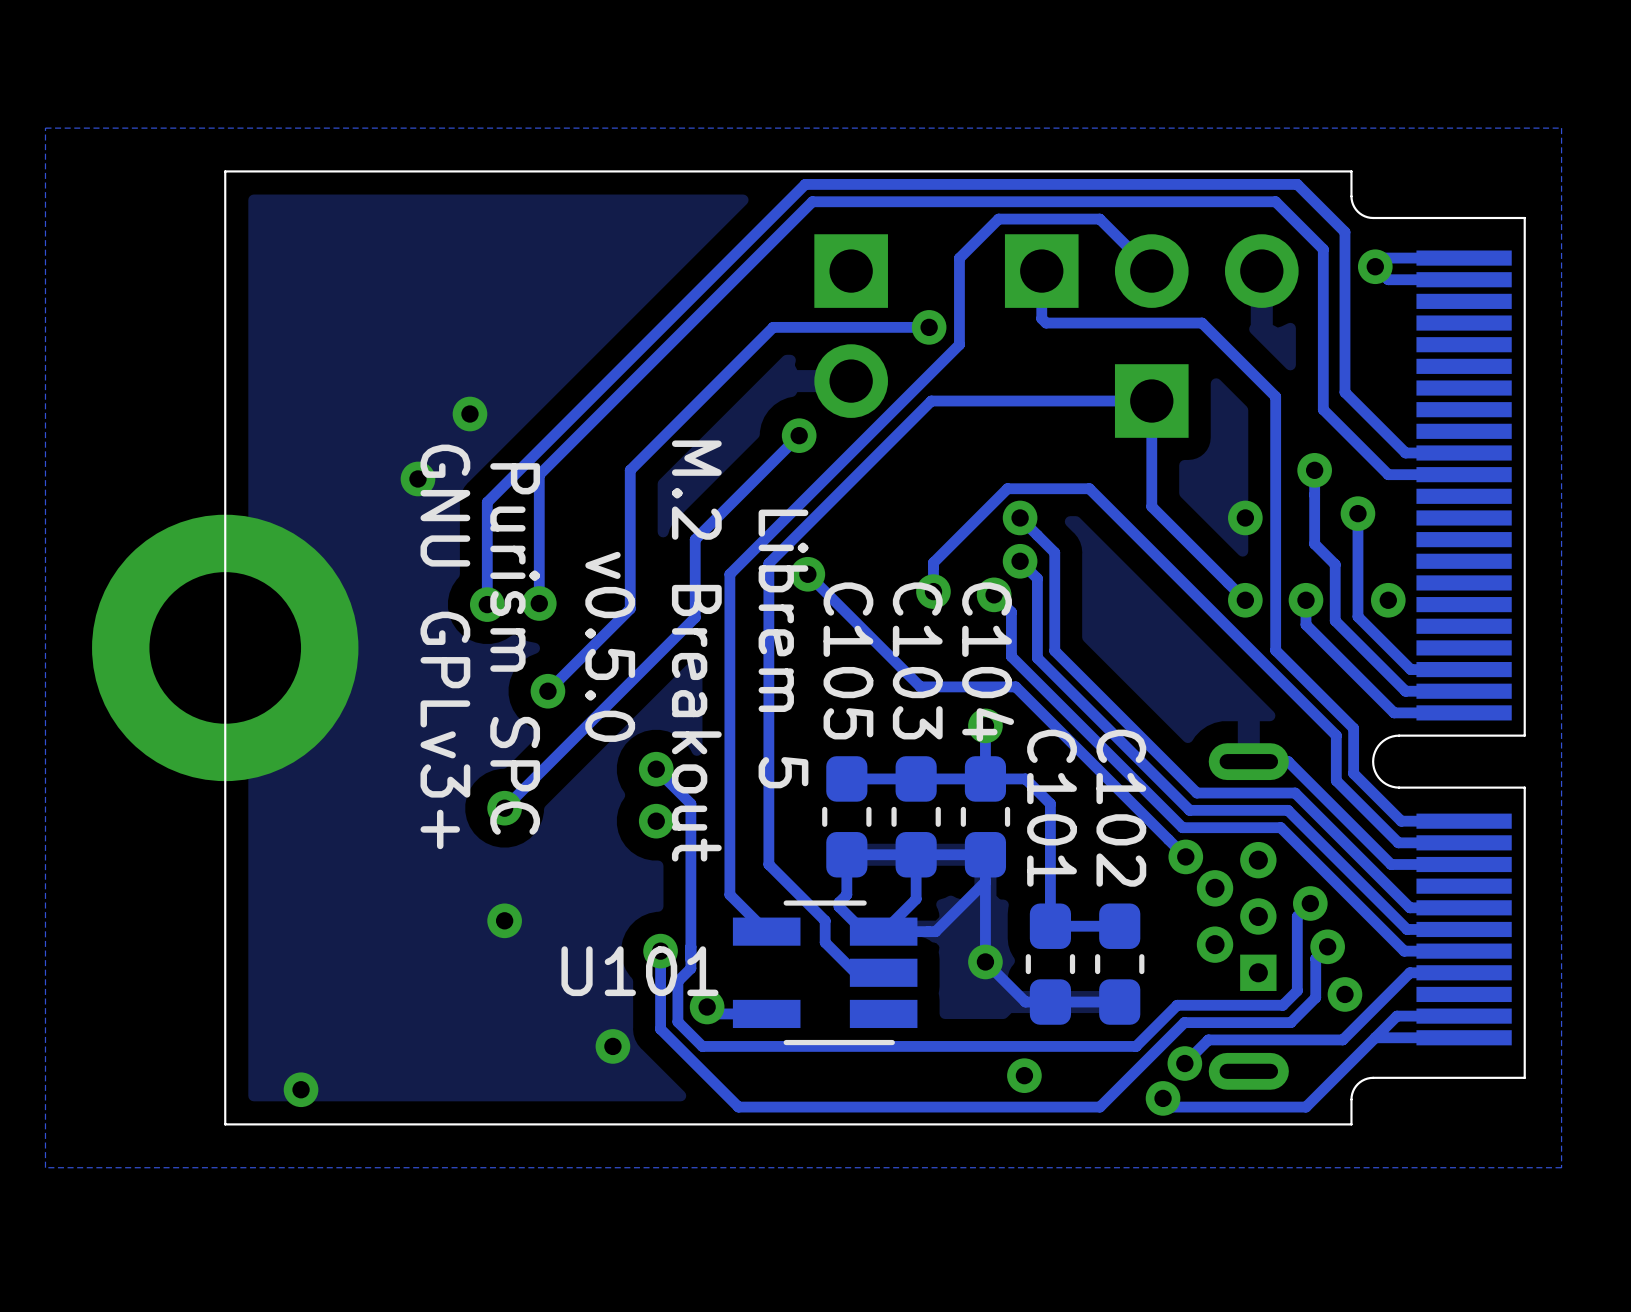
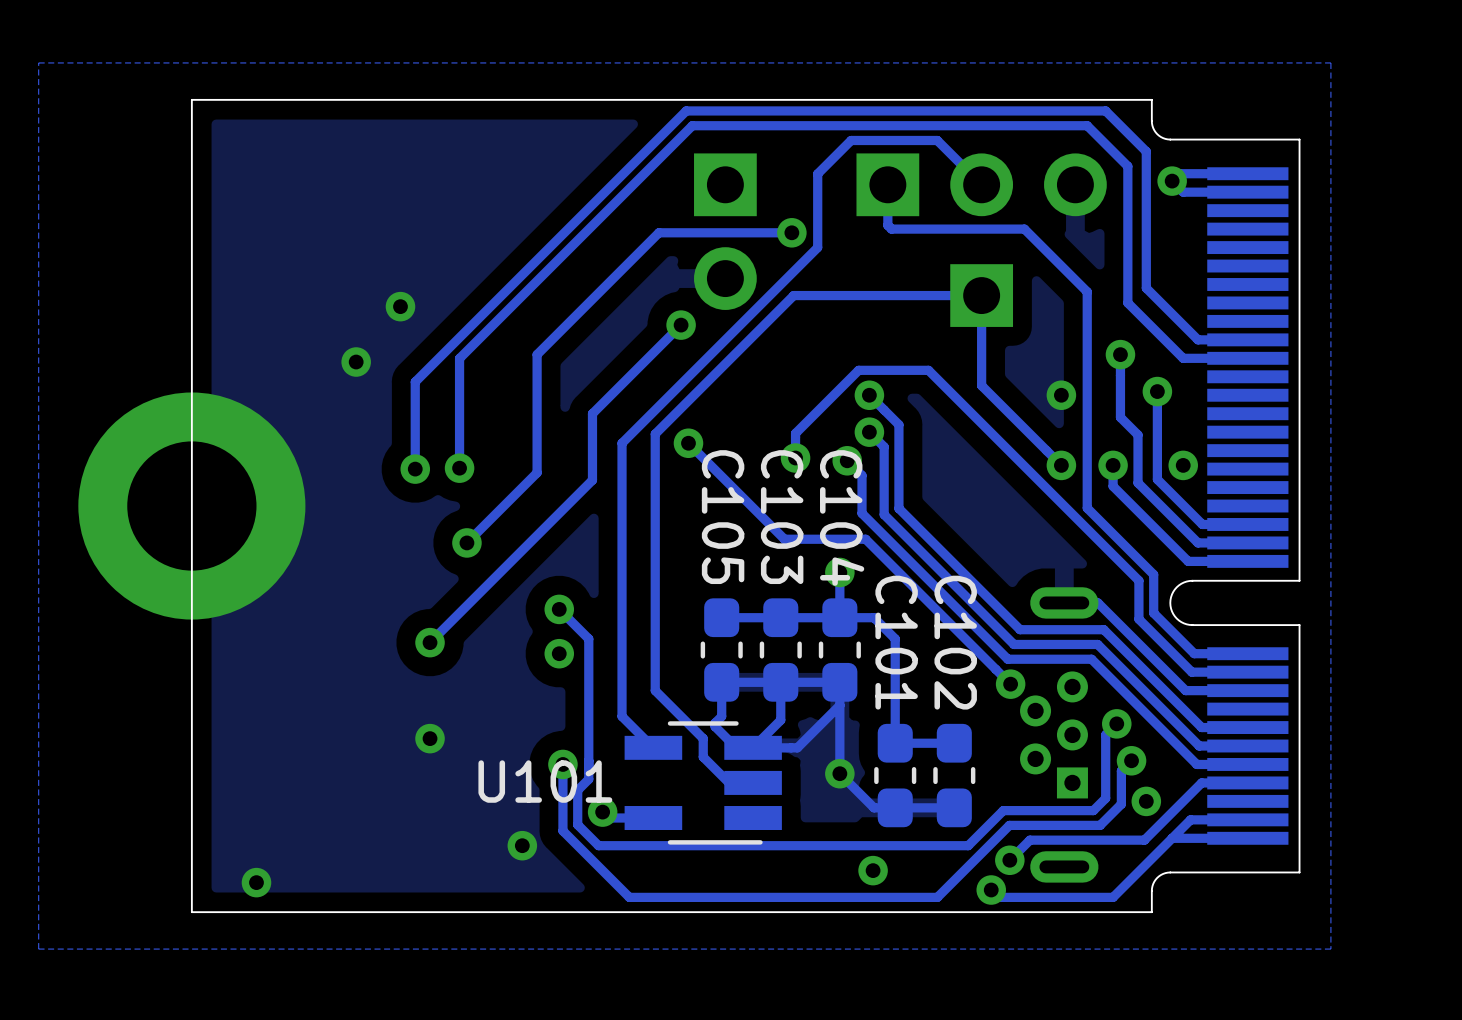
text: GNU GPLv3+ (445, 646) -> none
text: v0.5.0 (610, 646) -> none
text: Purism SPC (515, 648) -> none
text: Librem 5 (783, 648) -> none
text: M.2 Breakout (696, 651) -> none

